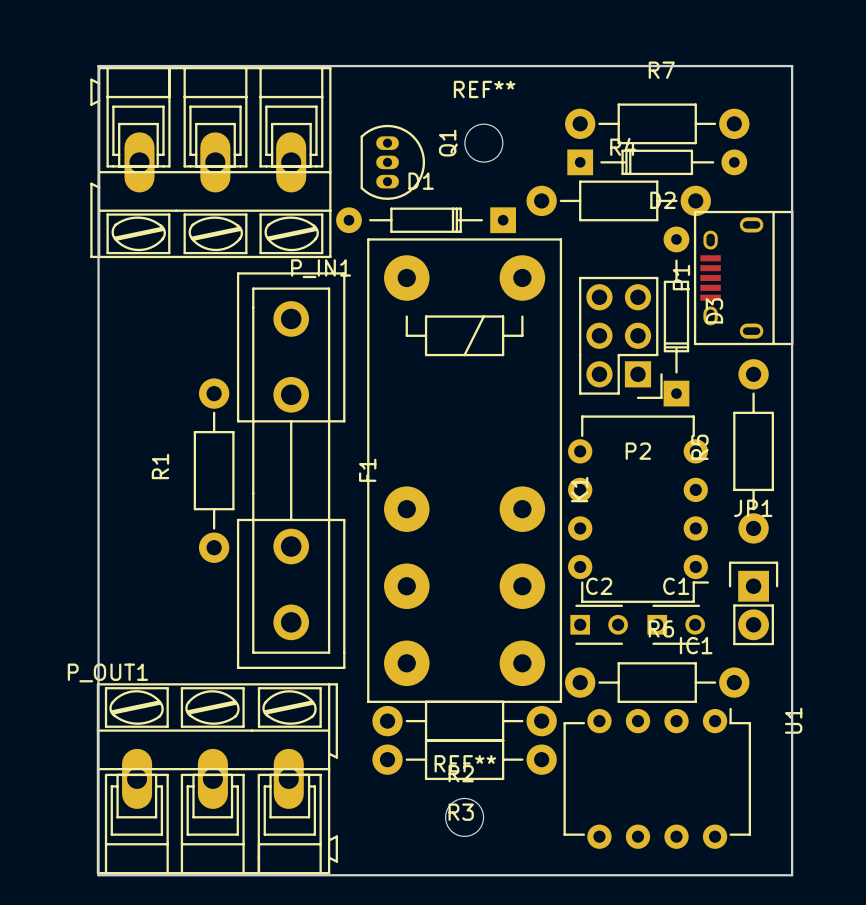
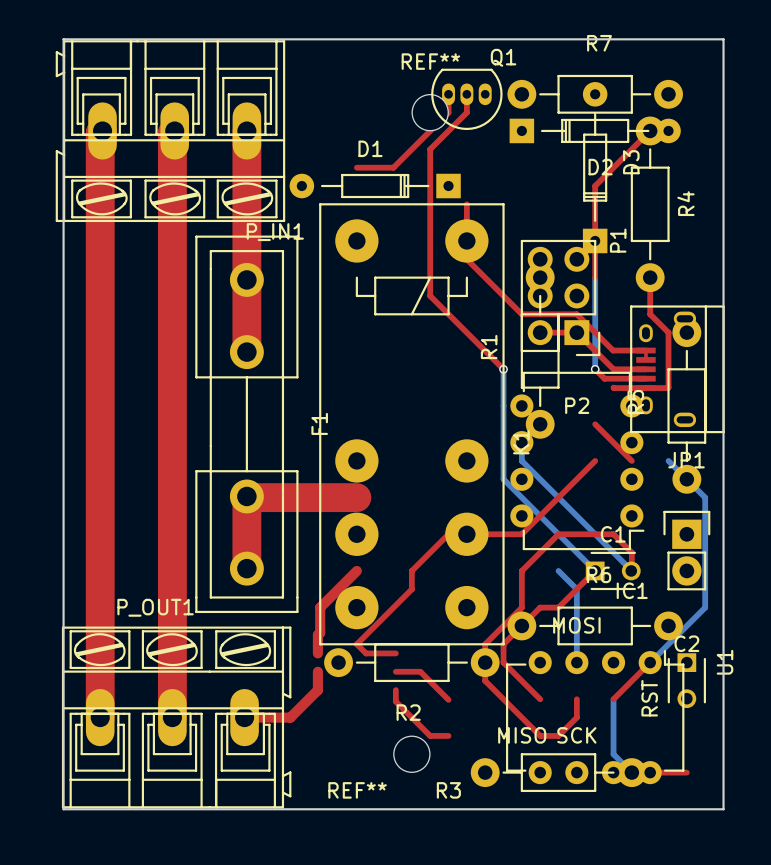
top track: none -> (448, 94) (448, 112) (393, 167) (356, 167)
top track: none -> (466, 94) (466, 112) (430, 149) (430, 295) (503, 369)
top track: none -> (102, 130) (100, 133) (100, 717)
top track: none -> (174, 130) (172, 133) (172, 717)
top track: none -> (246, 130) (246, 352)
Q1 rotation: 0° (392, 162) -> 90° clockwise (466, 99)
Q1 position: (392, 162) -> (466, 99)
top track: none -> (650, 130) (595, 186) (595, 277)
R4 rotation: 0° (618, 200) -> 90° clockwise (650, 204)
top track: none -> (466, 204) (466, 259) (521, 314) (576, 314) (613, 350) (645, 350) (645, 359)
P1 position: (743, 278) -> (677, 369)
bottom track: none -> (595, 277) (595, 369)
D3 position: (676, 316) -> (595, 167)
top track: none -> (650, 277) (650, 314) (668, 332) (668, 387) (613, 387)
top track: none -> (540, 332) (576, 332) (613, 369) (645, 369)
bottom track: none -> (503, 369) (503, 479) (595, 570)
via: none -> (503, 369)
top track: none -> (595, 369) (604, 378) (645, 378)
via: none -> (595, 369)
R1 position: (214, 470) -> (540, 350)
bottom track: none -> (540, 424) (521, 442) (521, 460) (631, 570)
top track: none -> (595, 424) (631, 460)
top track: none -> (595, 460) (521, 534) (448, 534) (411, 570) (411, 589) (356, 644) (366, 653) (395, 653)
bottom track: none -> (668, 460) (705, 497) (705, 607) (650, 662)
top track: none -> (356, 497) (246, 496) (246, 568)
top track: none -> (356, 570) (320, 607) (317, 653)
C2 rotation: 0° (599, 624) -> 90° clockwise (686, 680)
C2 position: (599, 624) -> (686, 680)
bottom track: none -> (558, 570) (576, 589) (576, 662)
top track: none -> (595, 570) (558, 607) (540, 607) (503, 644) (503, 662) (540, 699)
top track: none -> (631, 570) (631, 552) (613, 534) (558, 534) (521, 570) (521, 607) (485, 644) (485, 680) (540, 735) (558, 735) (576, 717) (576, 699)
P_OUT1 name position: P_OUT1 (107, 672) -> P_OUT1 (155, 607)
text: none -> MOSI (576, 625)
top track: none -> (650, 662) (613, 699)
top track: none -> (317, 671) (317, 690) (290, 717) (244, 717)
top track: none -> (395, 671) (420, 671) (448, 699)
top track: none -> (395, 690) (395, 701) (430, 735) (448, 735)
text: none -> RST (649, 698)
R3 position: (464, 759) -> (558, 772)
bottom track: none -> (613, 699) (613, 754) (631, 772)
REF** name position: REF** (465, 763) -> REF** (357, 790)
text: none -> MISO (522, 735)
text: none -> SCK (576, 735)
R3 name position: R3 (461, 812) -> R3 (448, 790)
top track: none -> (631, 772) (686, 772)

